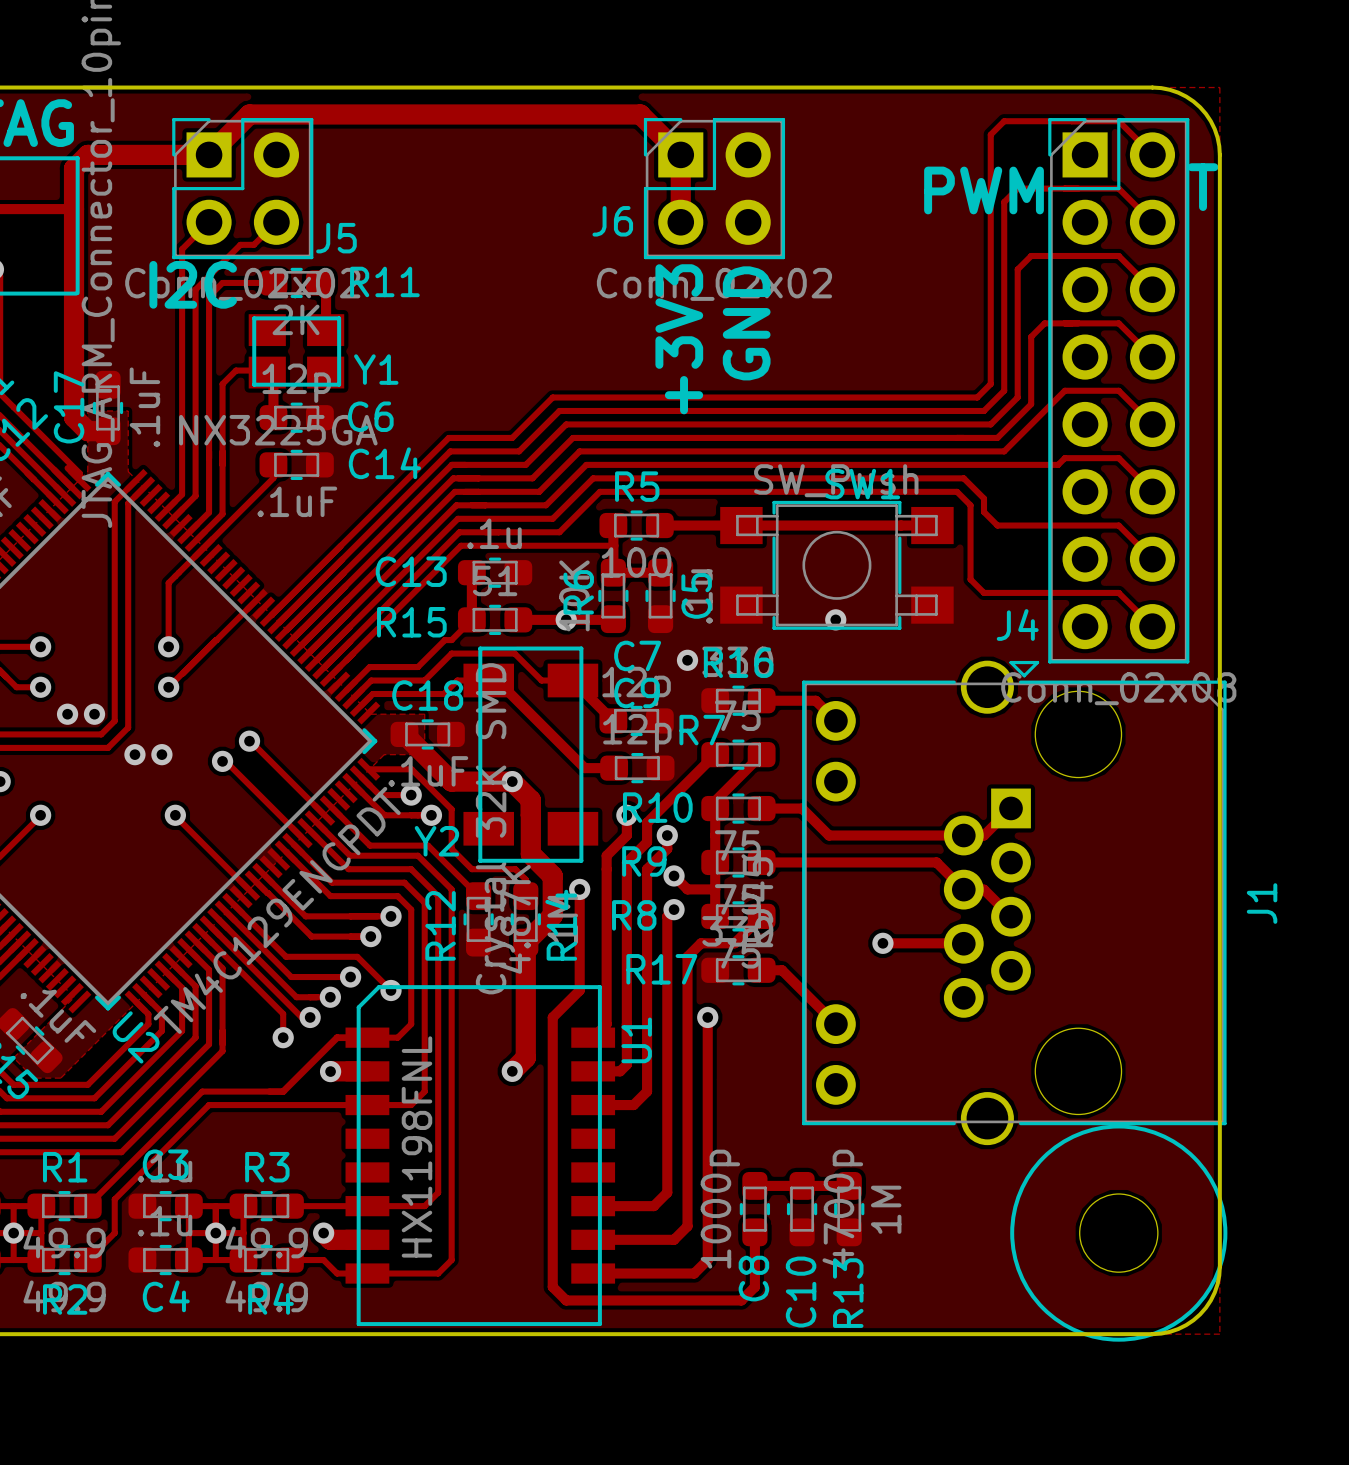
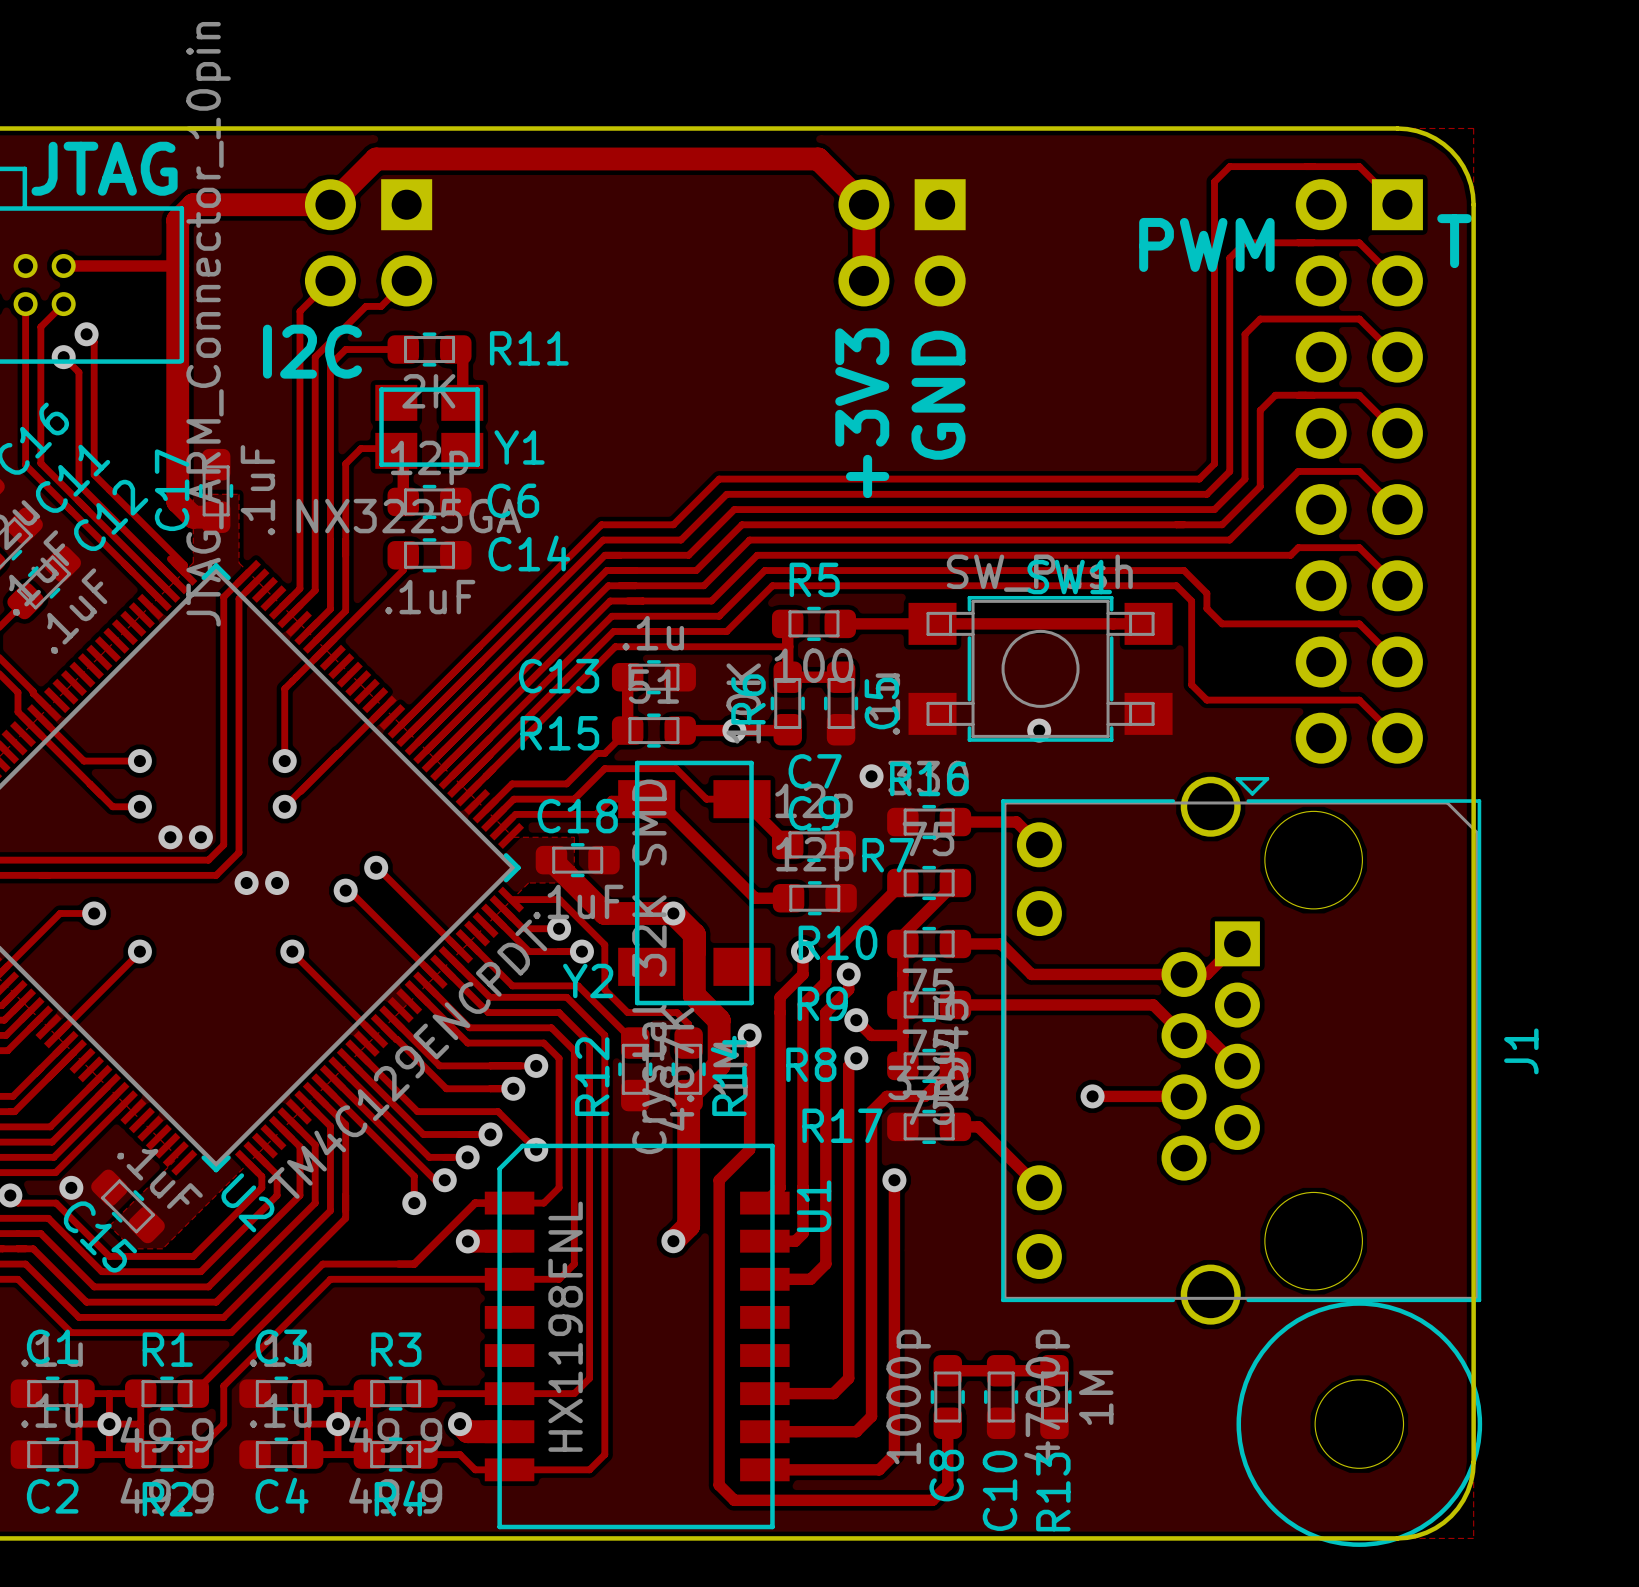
J5 side: top (242, 188) -> bottom (368, 242)
J6 side: top (714, 188) -> bottom (902, 242)
J4 side: top (1118, 390) -> bottom (1359, 471)

